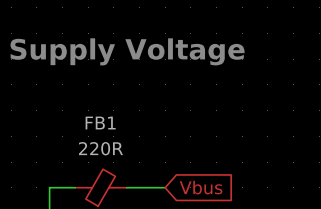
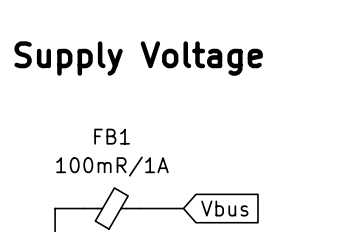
FB1 value: 220R (100, 148) -> 100mR/1A (112, 166)

